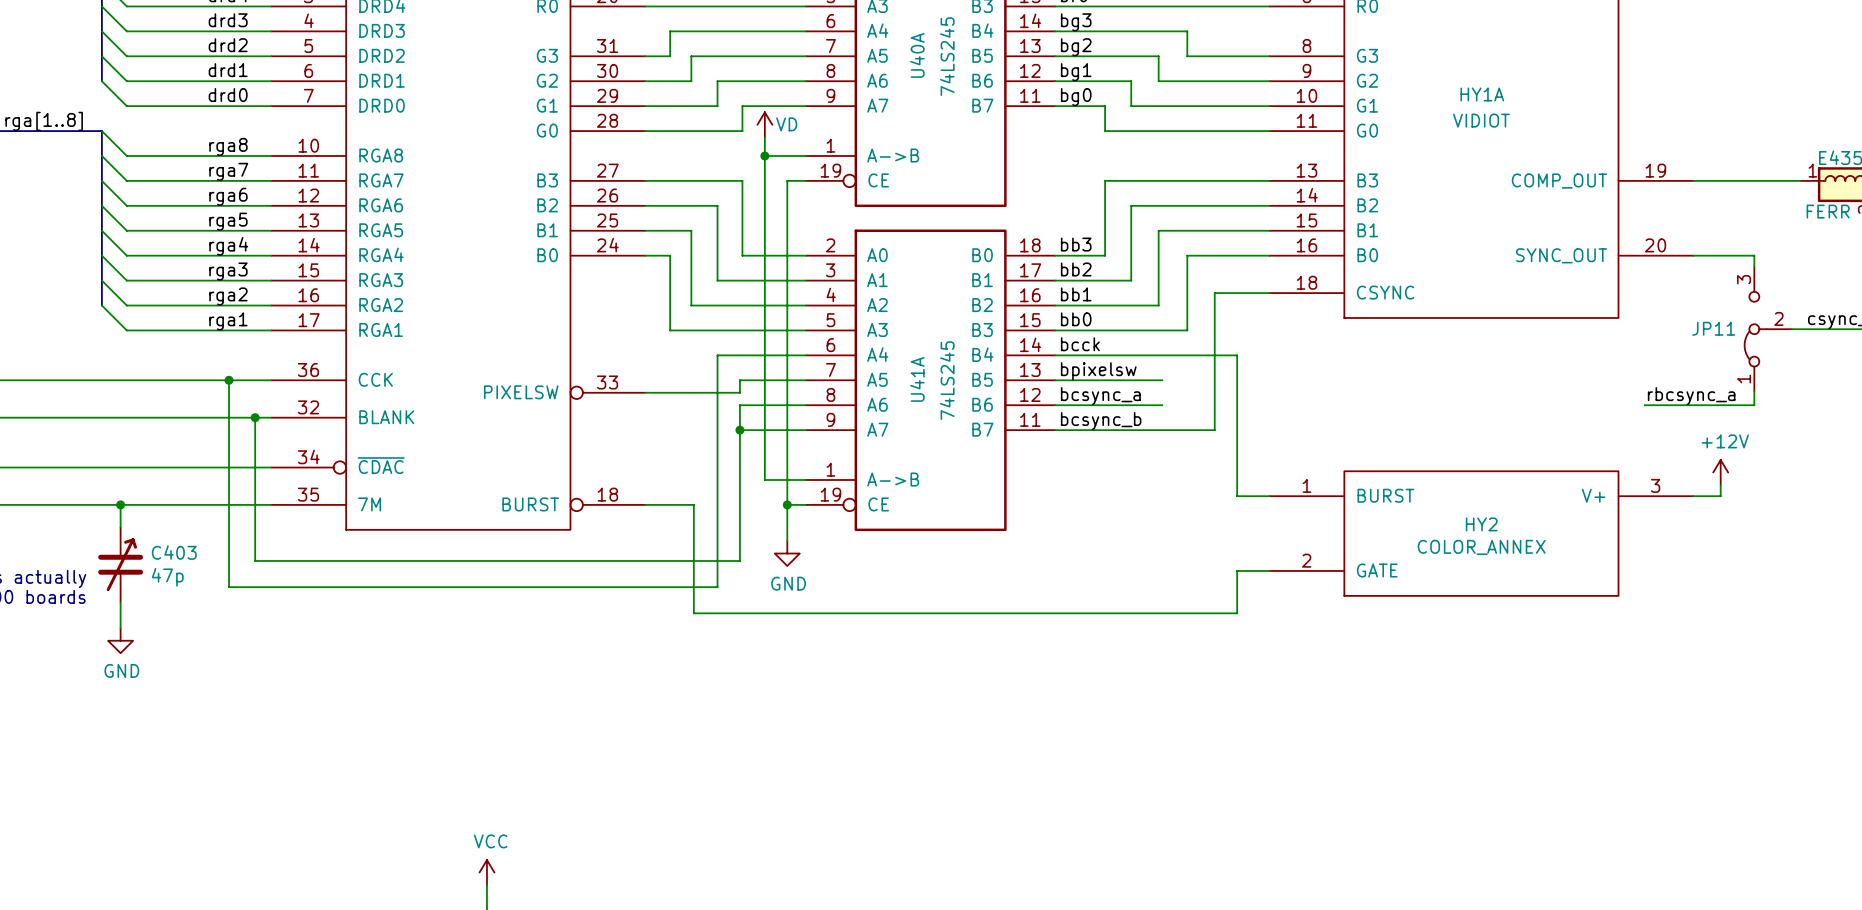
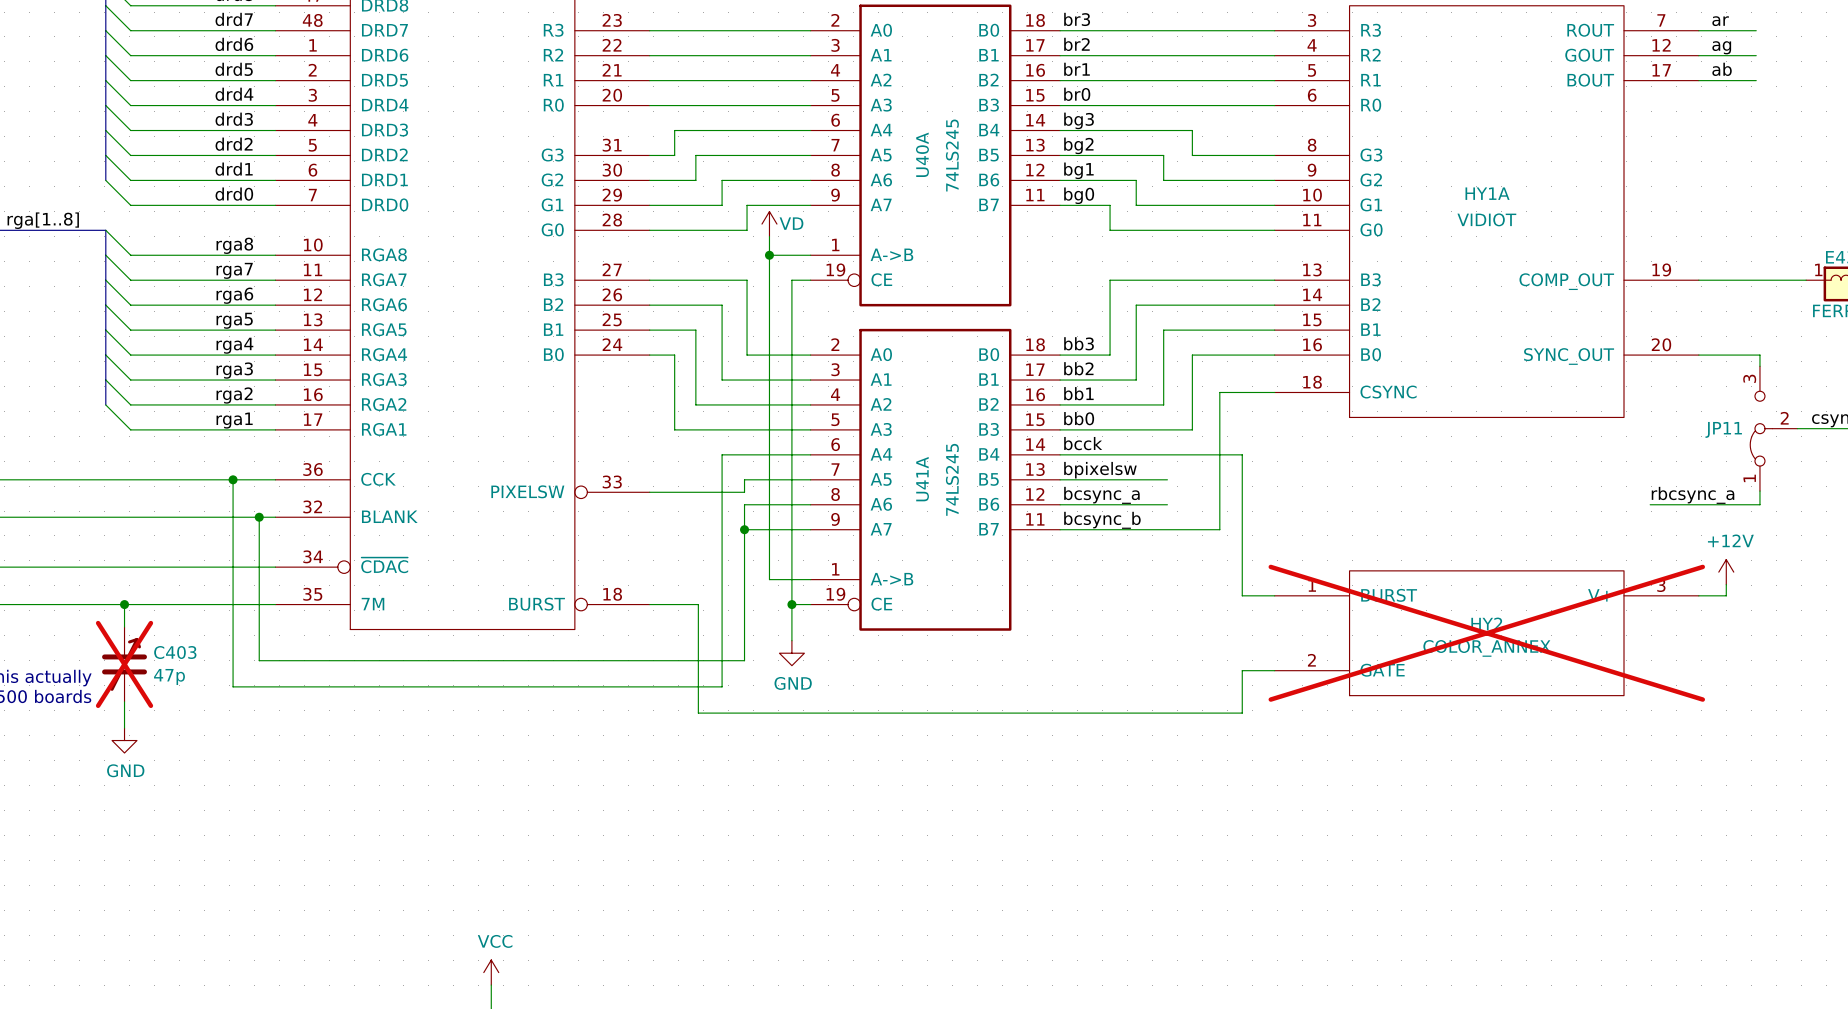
HY2 do-not-place cross: none -> (1486, 633)
C403 do-not-place cross: none -> (124, 664)

